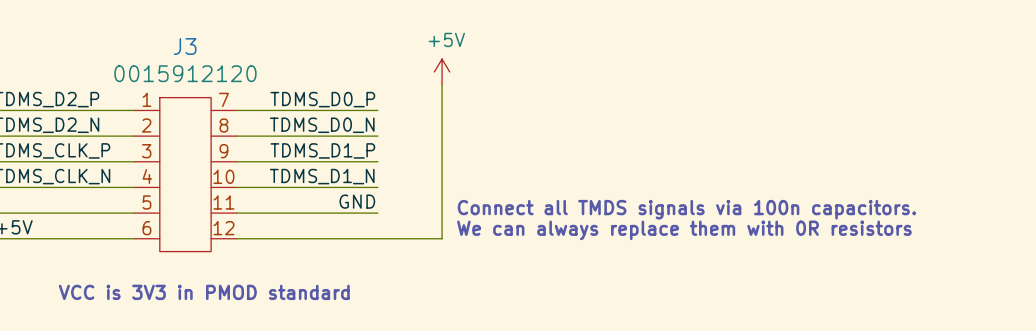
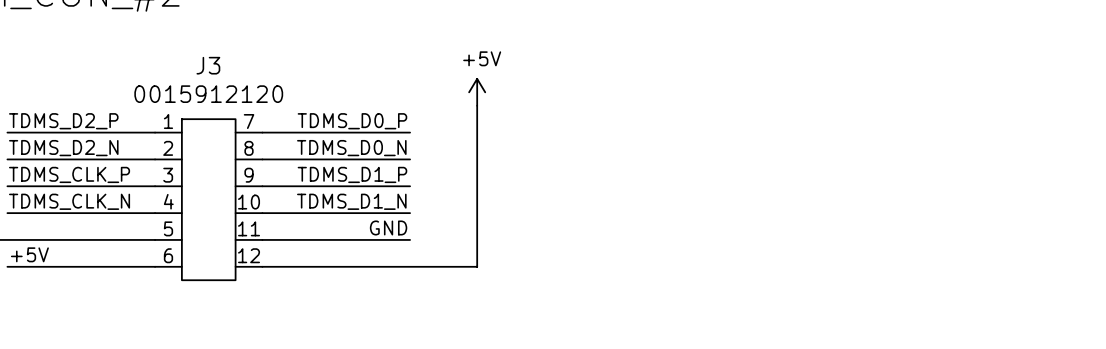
text: Connect all TMDS signals via 100n capacitors. (686, 209) -> none
text: We can always replace them with 0R resistors (684, 230) -> none
text: VCC is 3V3 in PMOD standard (204, 292) -> none

